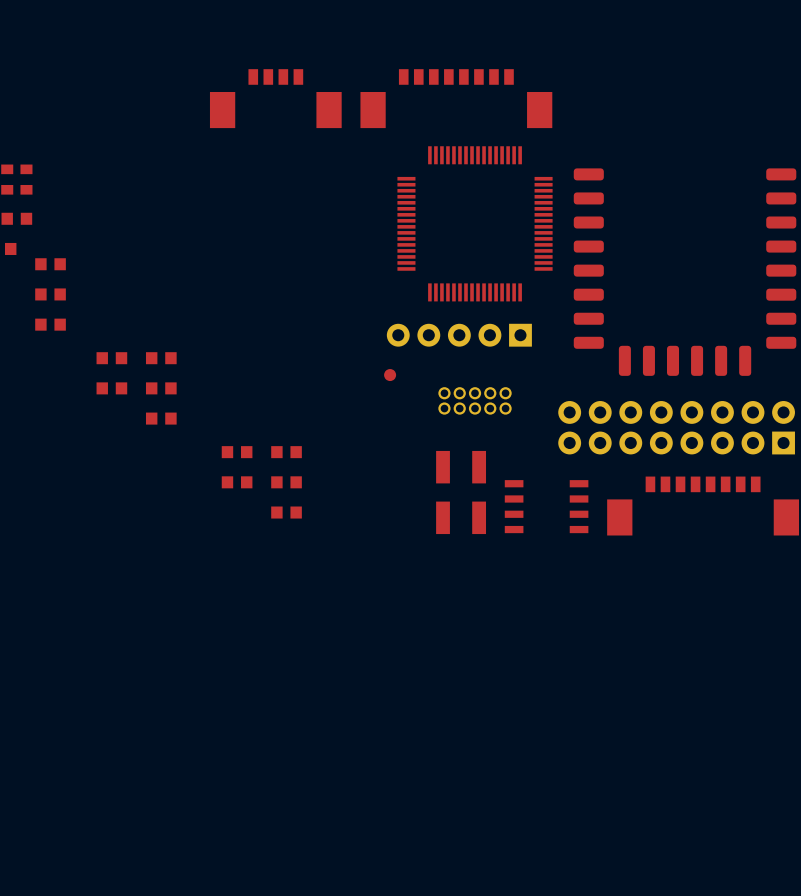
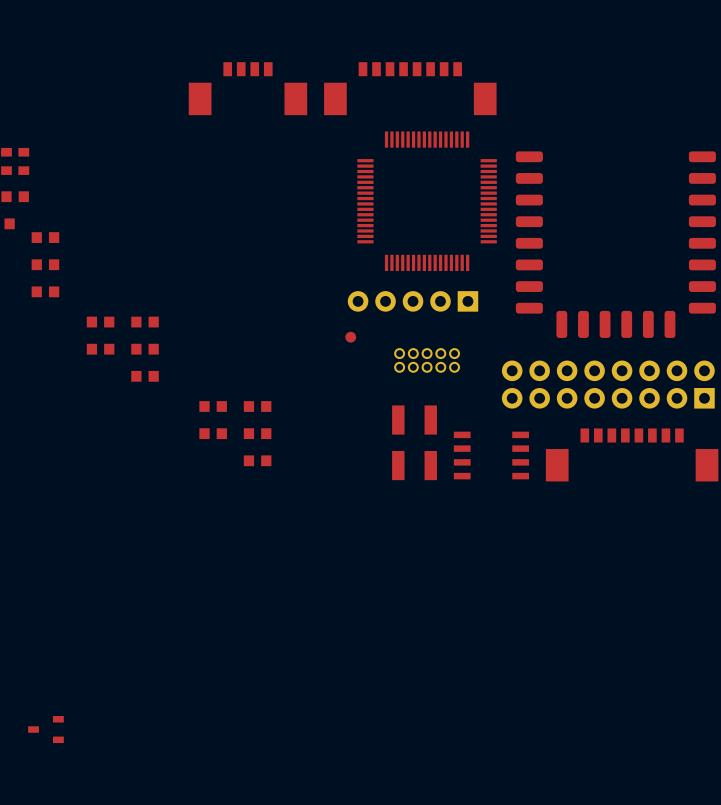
part: none -> (45, 729)

